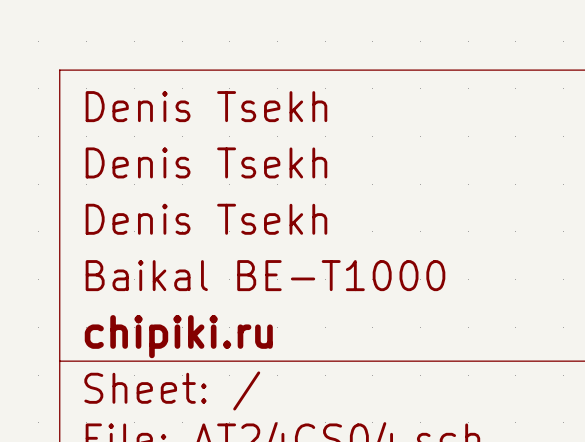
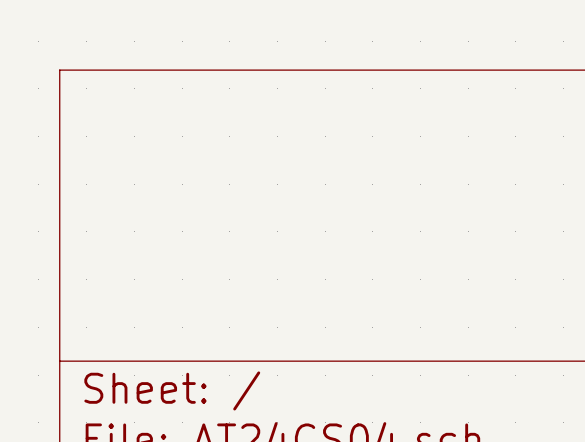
title block: Denis Tsekh (206, 106) -> none
title block: Denis Tsekh (206, 162) -> none
title block: Denis Tsekh (206, 219) -> none
title block: Baikal BE-T1000 (265, 275) -> none
title block: chipiki.ru (178, 336) -> none

